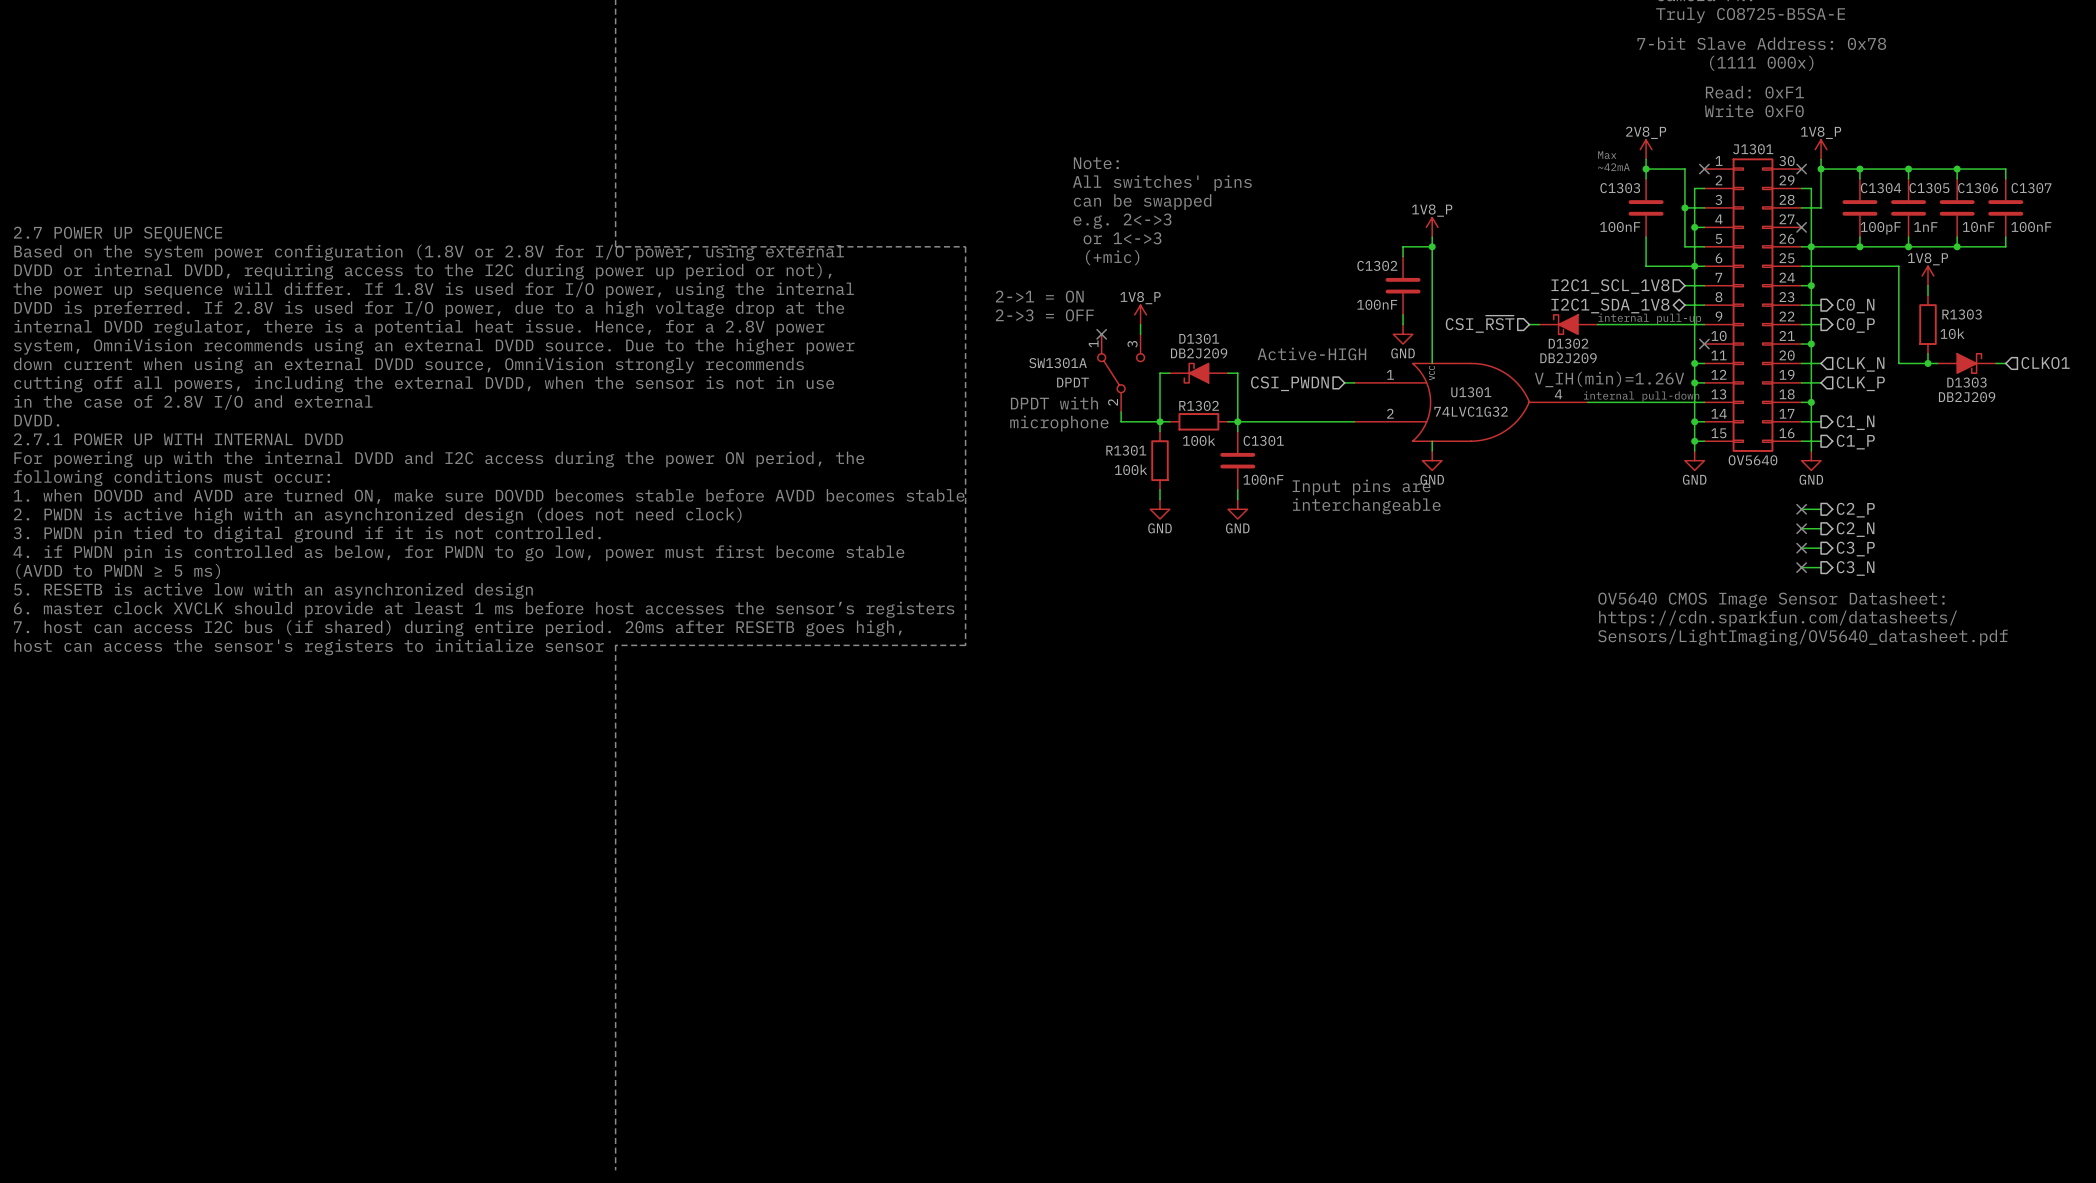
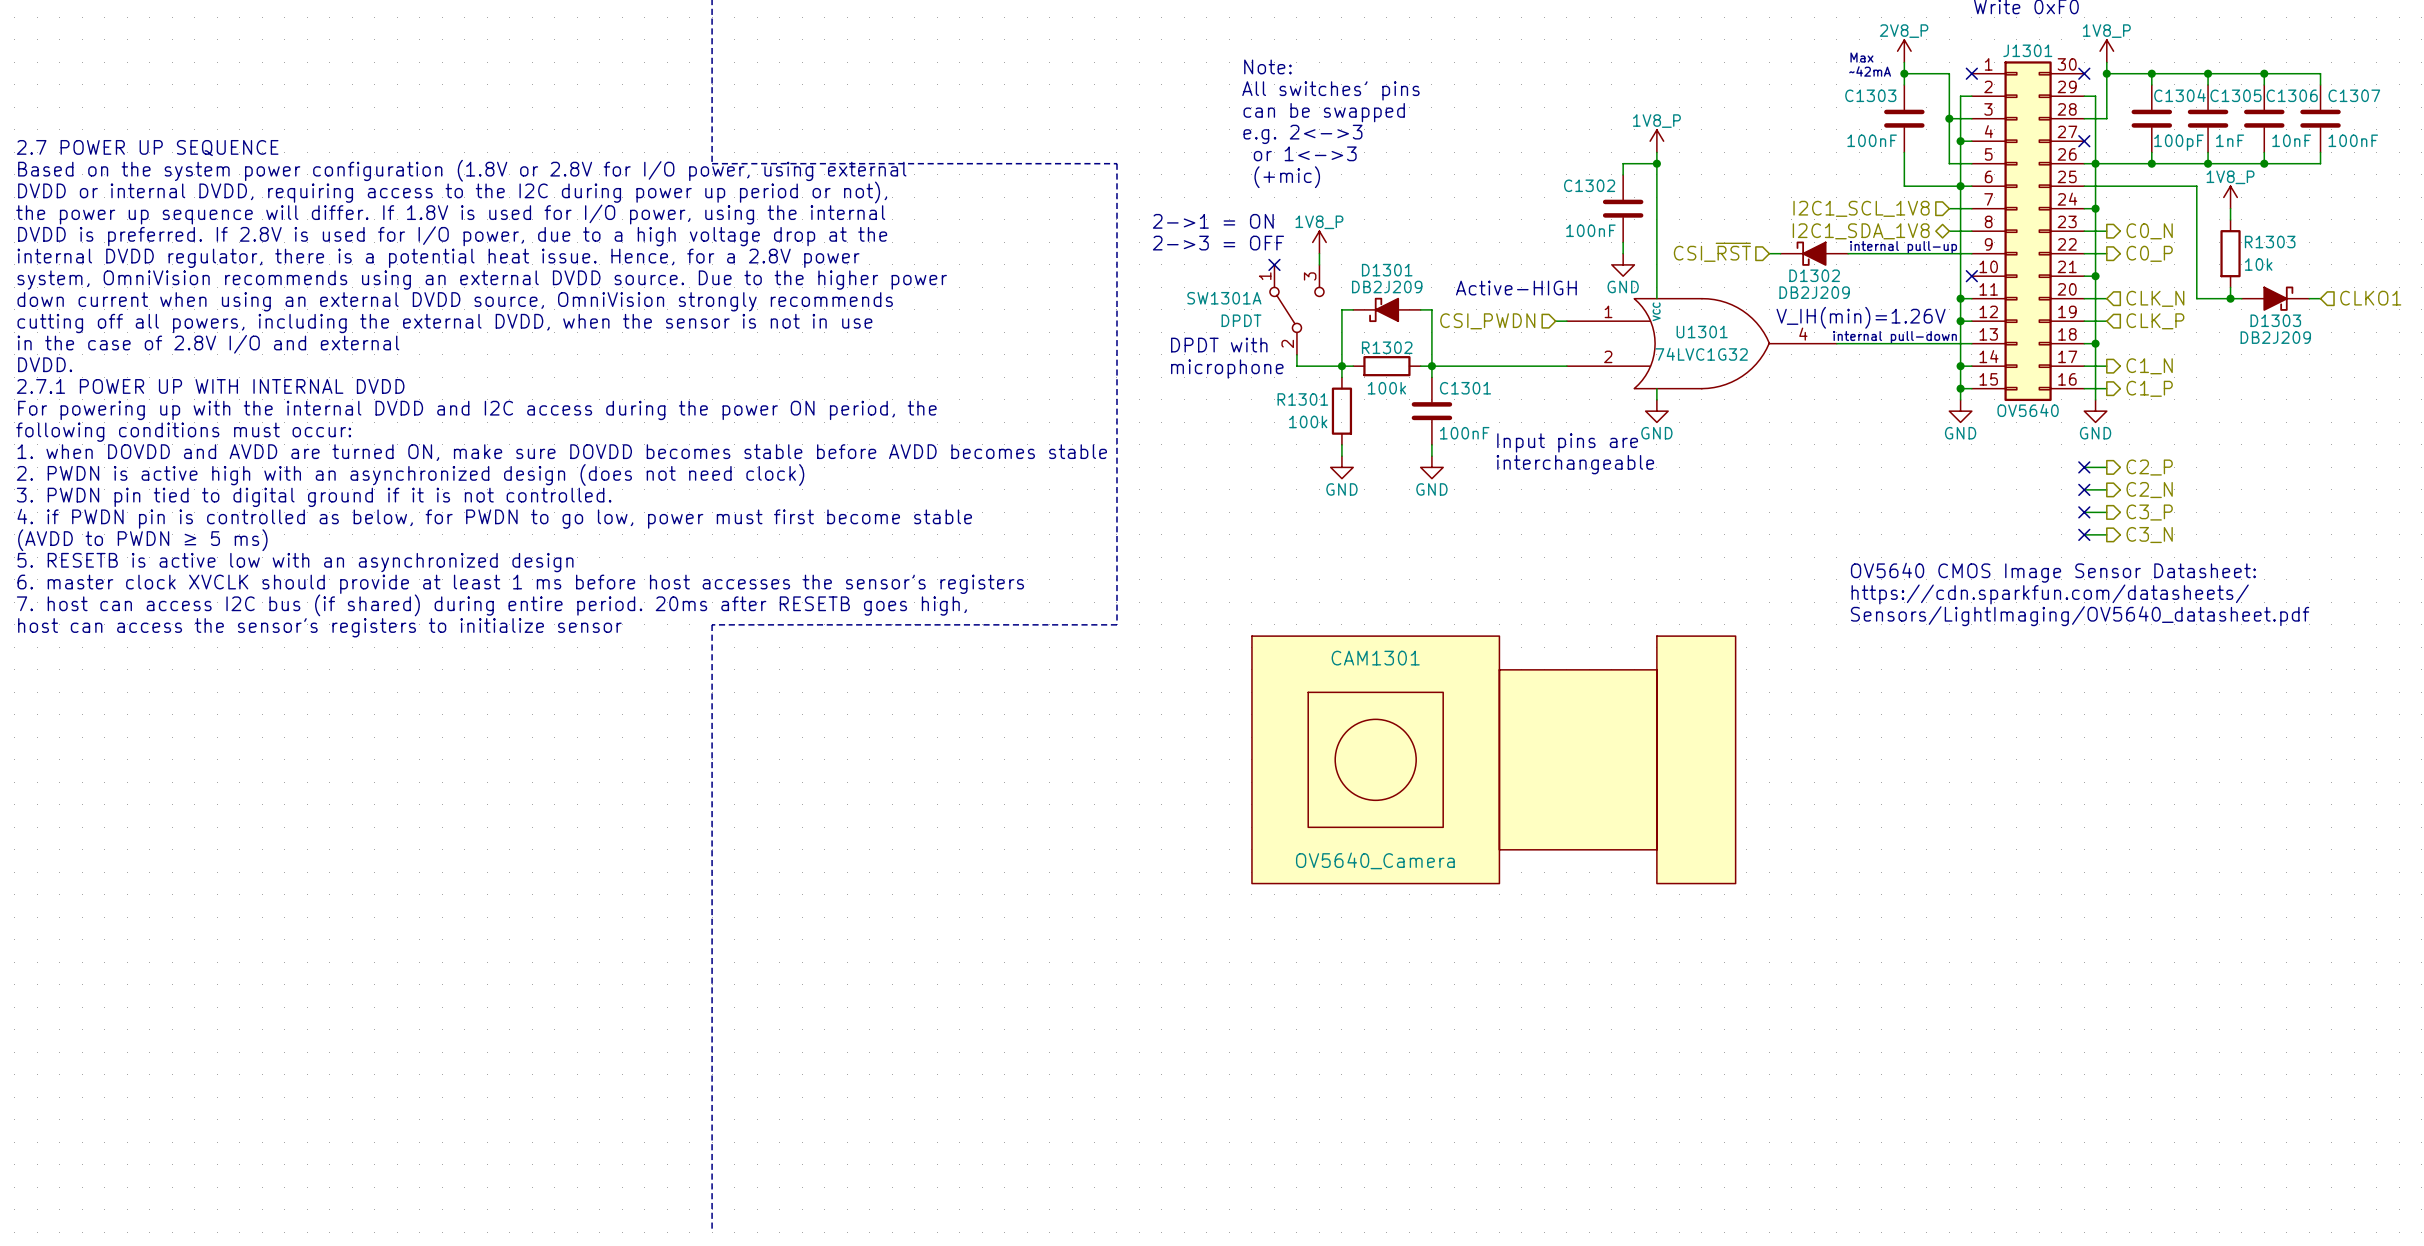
CAM1301: none -> OV5640_Camera (1493, 759)

